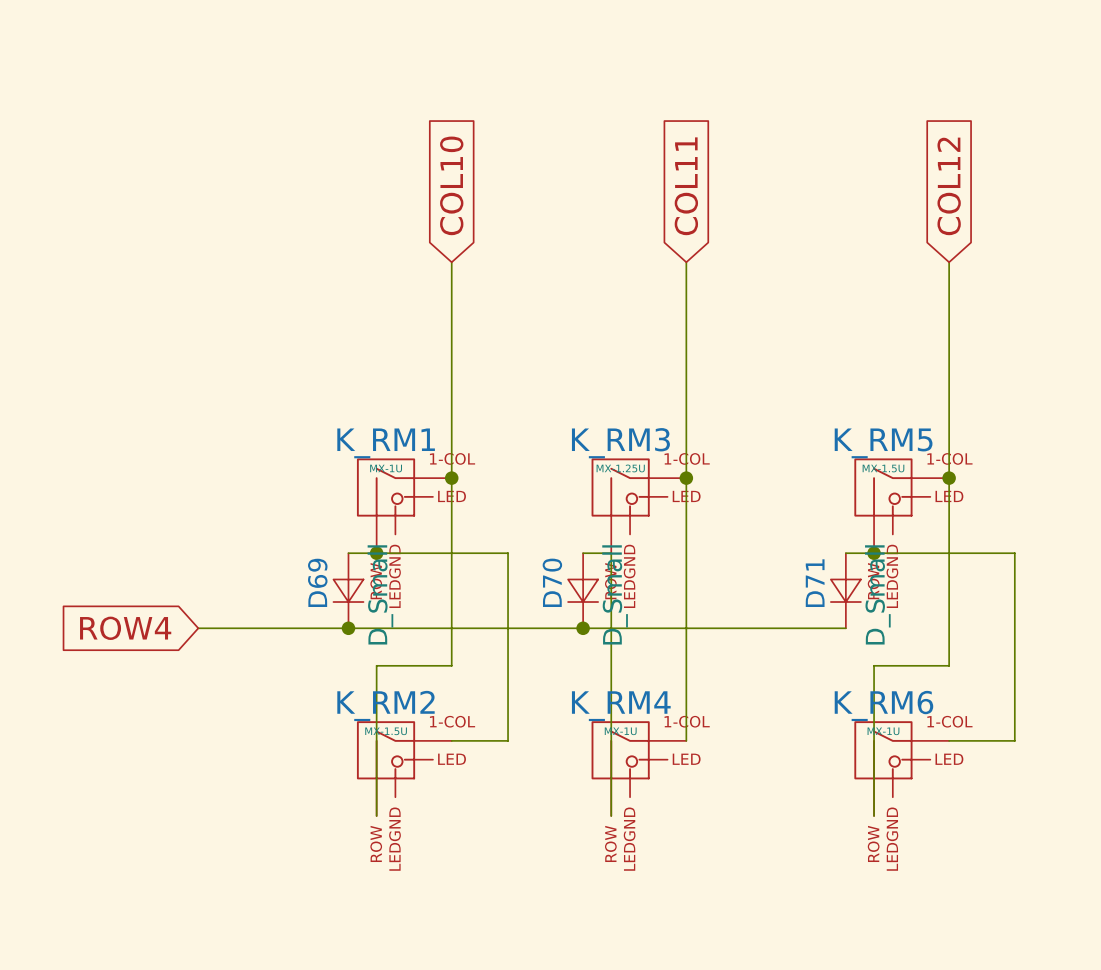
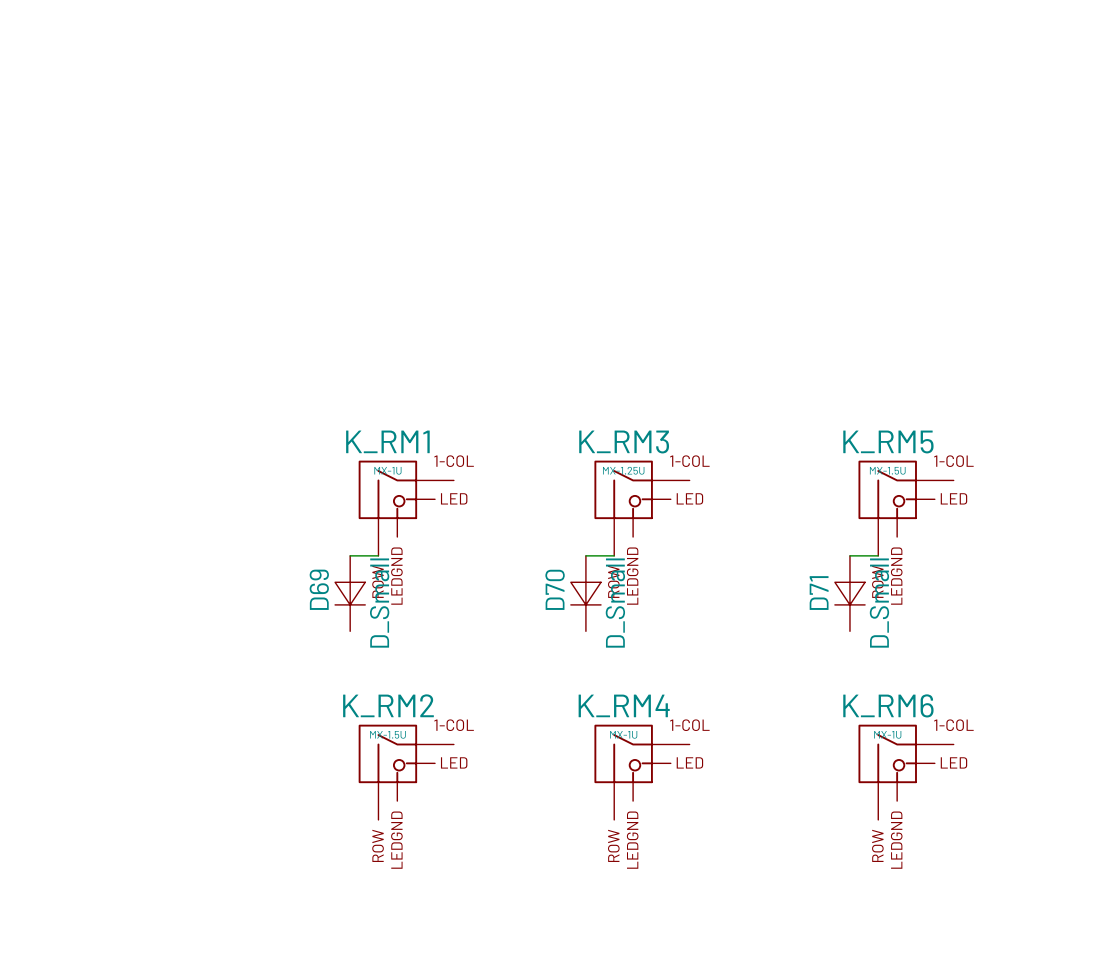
global label: COL10 (451, 185) -> none
global label: COL11 (686, 186) -> none
global label: COL12 (949, 186) -> none
wire: (451, 262) (451, 665) (376, 665) (376, 815) -> none
wire: (686, 262) (686, 740) -> none
wire: (949, 262) (949, 665) (874, 665) (874, 815) -> none
junction: (451, 478) -> none
junction: (686, 478) -> none
junction: (949, 478) -> none
wire: (376, 553) (508, 553) (508, 740) (451, 740) -> none
junction: (376, 553) -> none
wire: (611, 553) (611, 815) -> none
wire: (874, 553) (1014, 553) (1014, 740) (949, 740) -> none
junction: (874, 553) -> none
global label: ROW4 (125, 628) -> none
wire: (198, 628) (845, 628) -> none
junction: (348, 628) -> none
junction: (583, 628) -> none

